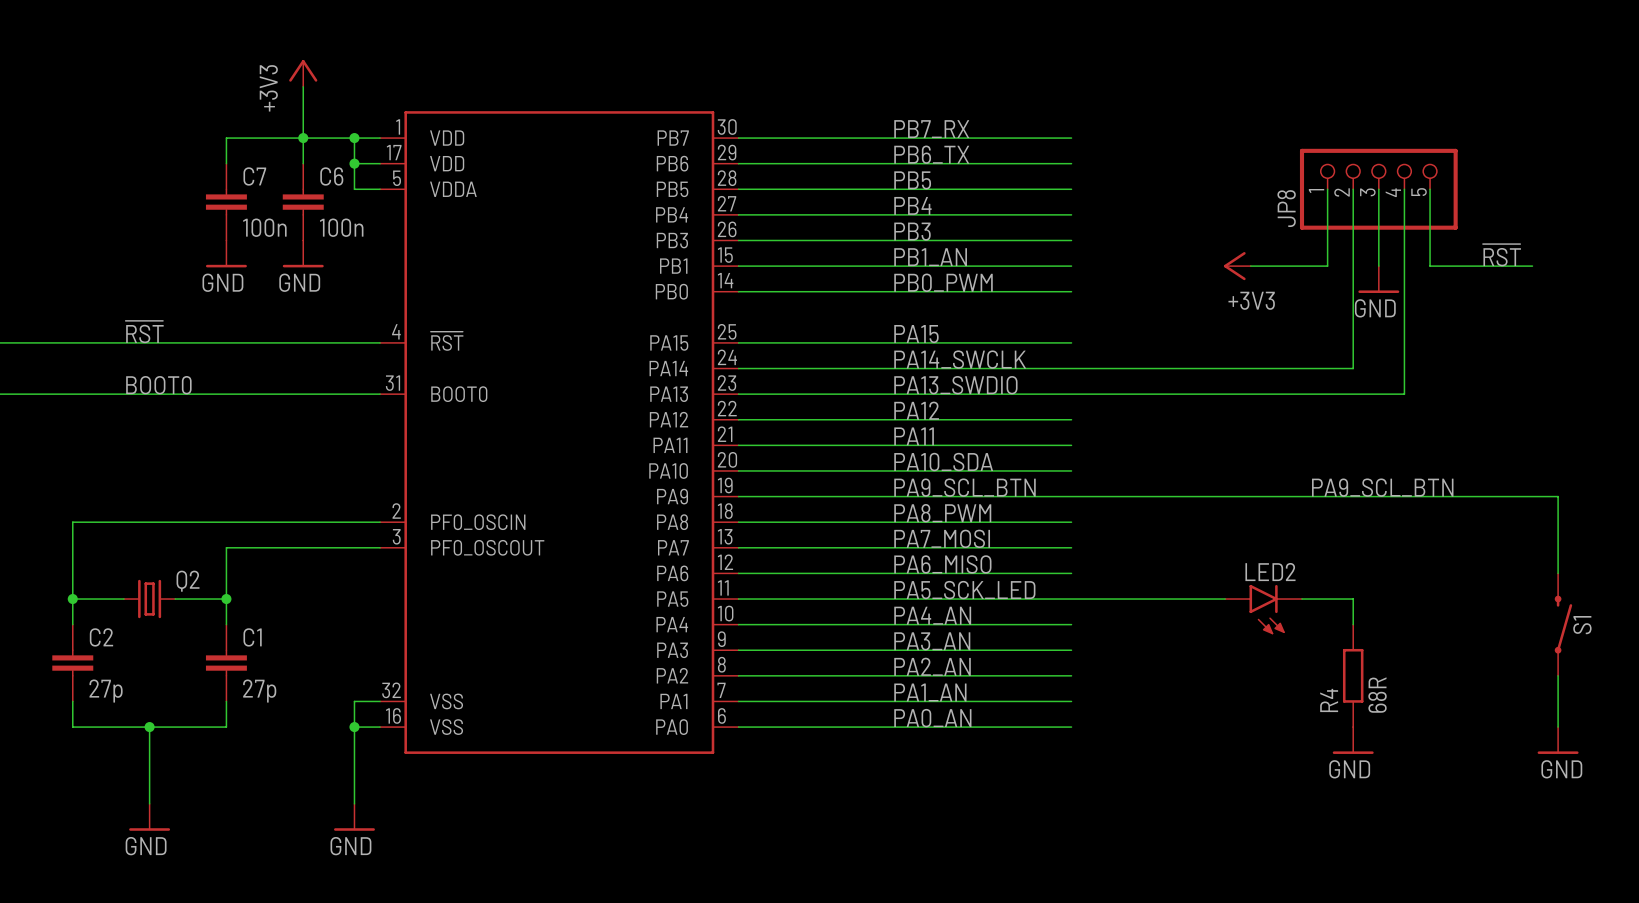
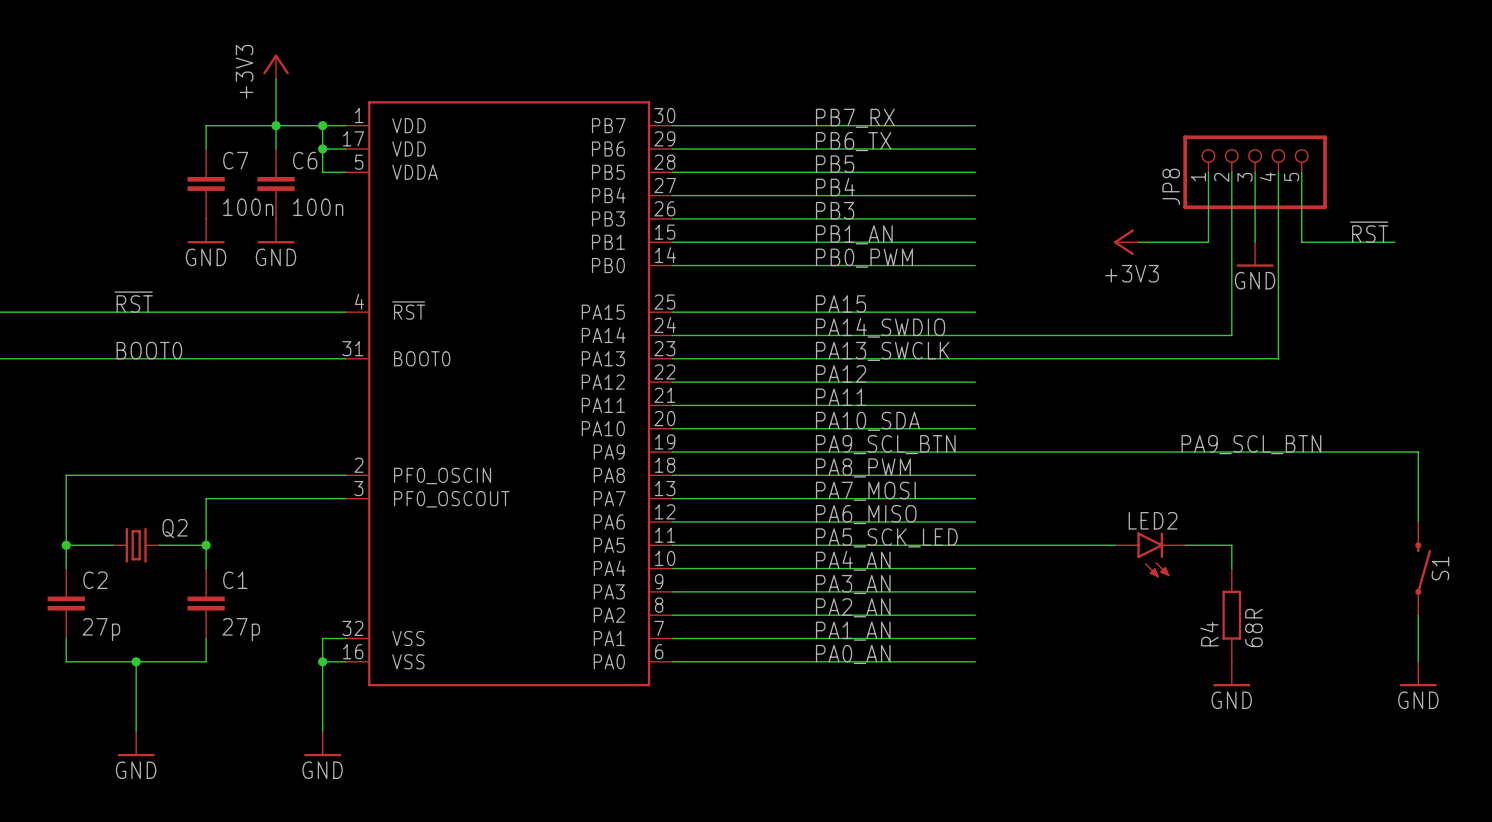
label: PA14_SWCLK (960, 359) -> PA14_SWDIO (880, 327)
label: PA13_SWDIO (955, 385) -> PA13_SWCLK (882, 351)

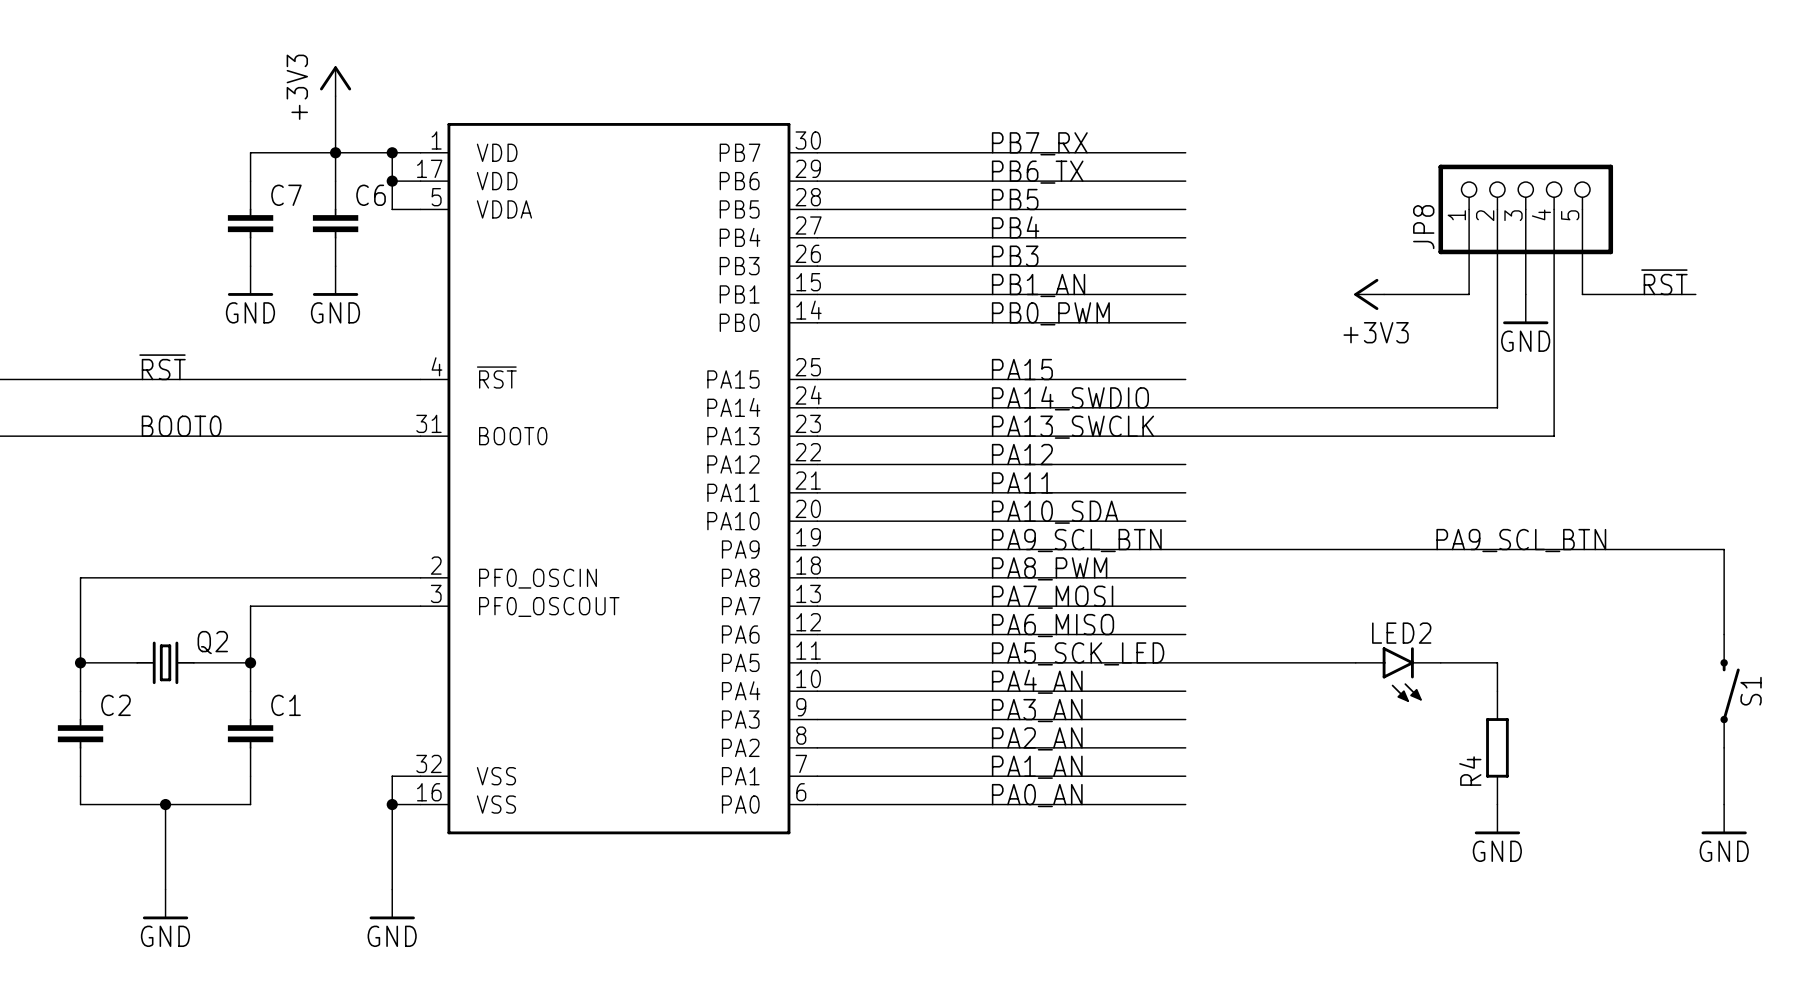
C7 value: 100n (248, 207) -> none
C6 value: 100n (318, 207) -> none
R4 value: 68R (1253, 627) -> none
C2 value: 27p (101, 629) -> none
C1 value: 27p (241, 629) -> none

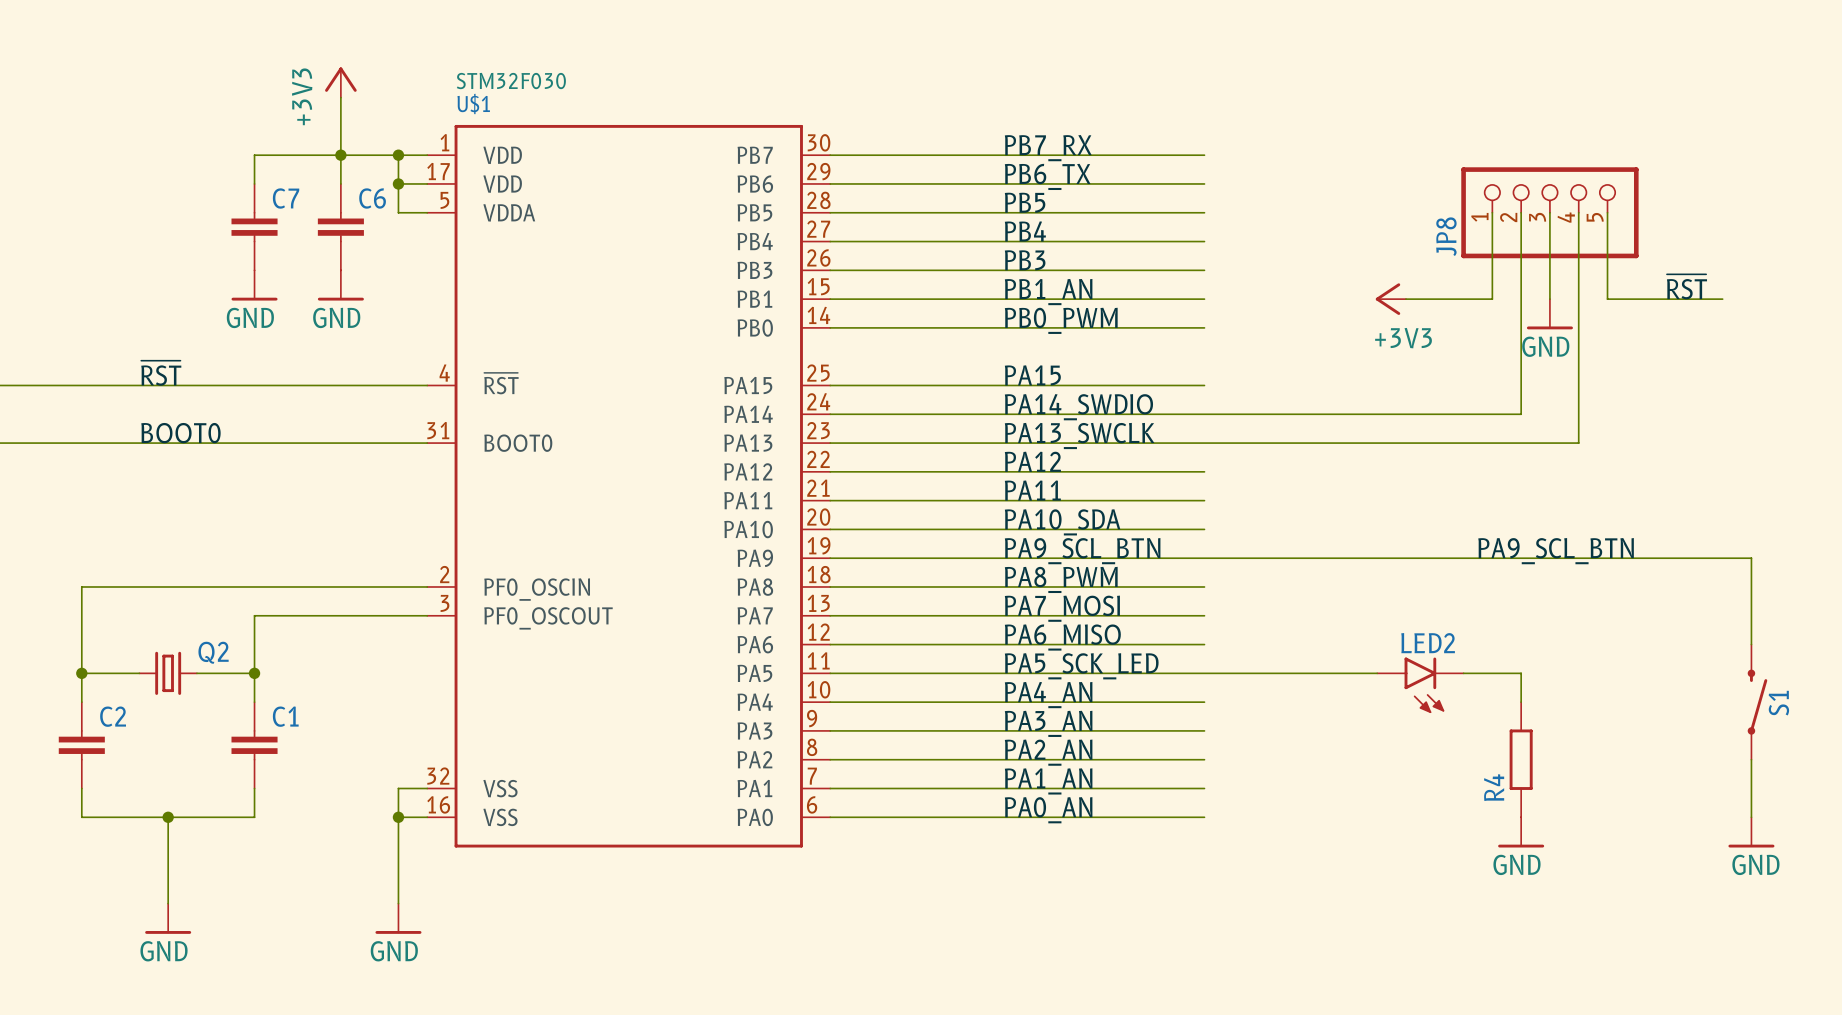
U$1 value: none -> STM32F030 (511, 81)
U$1 name: none -> U$1 (473, 103)

